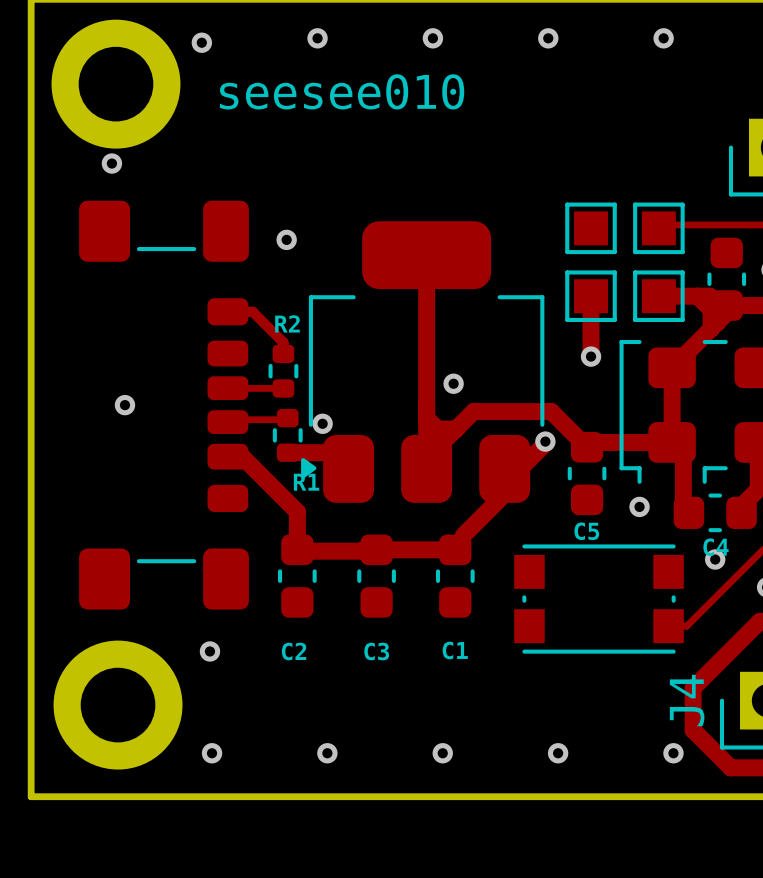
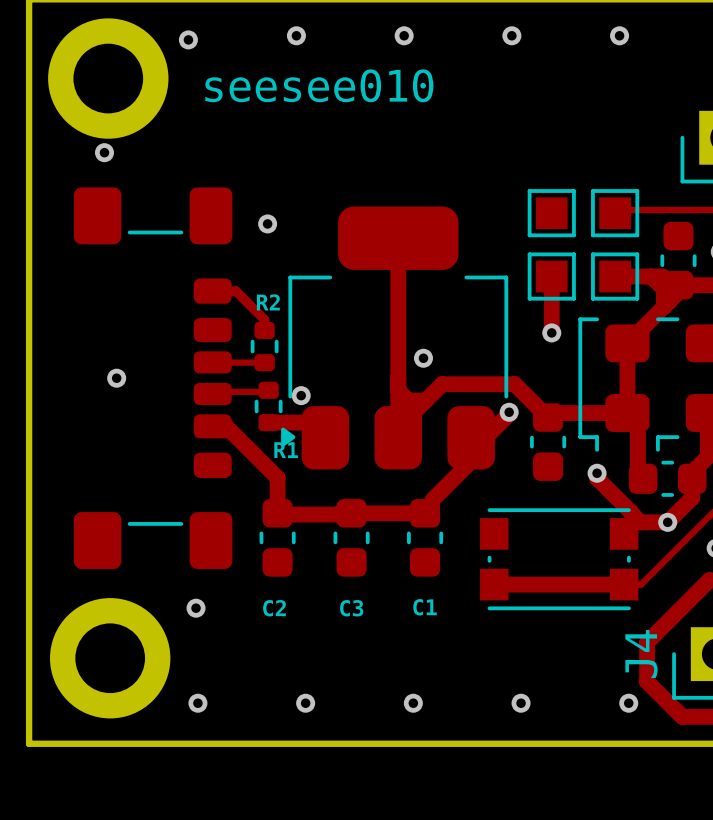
track: none -> (597, 473) (597, 478) (640, 522) (667, 522) (692, 497) (692, 478)
C5 name: C5 (586, 531) -> none
C4 name: C4 (715, 547) -> none
track: none -> (494, 584) (624, 584)

